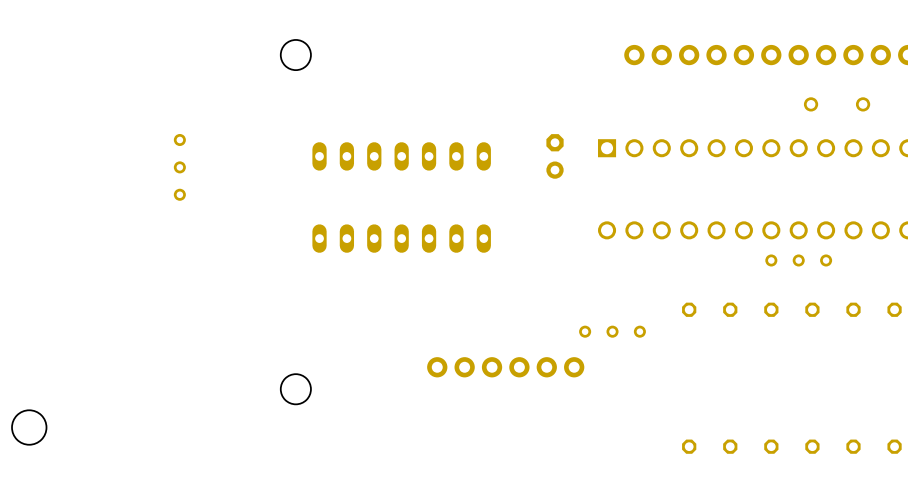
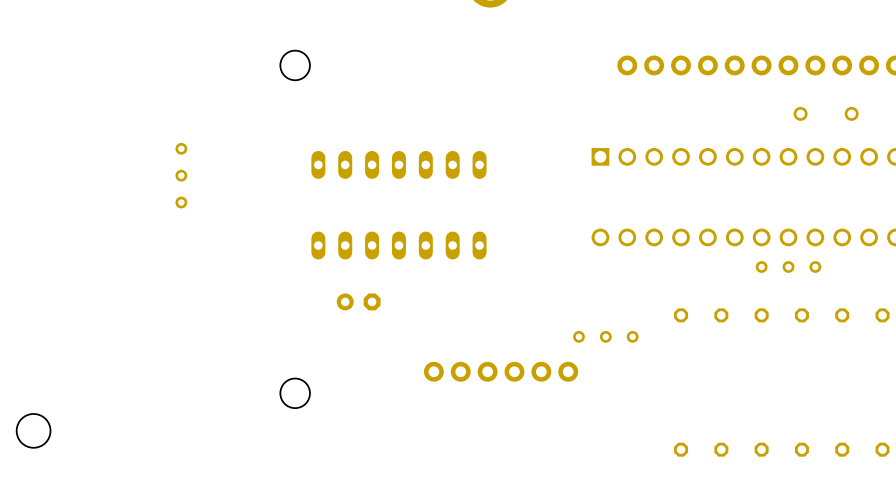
part rotation: 0° (555, 156) -> 90° clockwise (358, 301)
part position: (555, 156) -> (358, 301)

